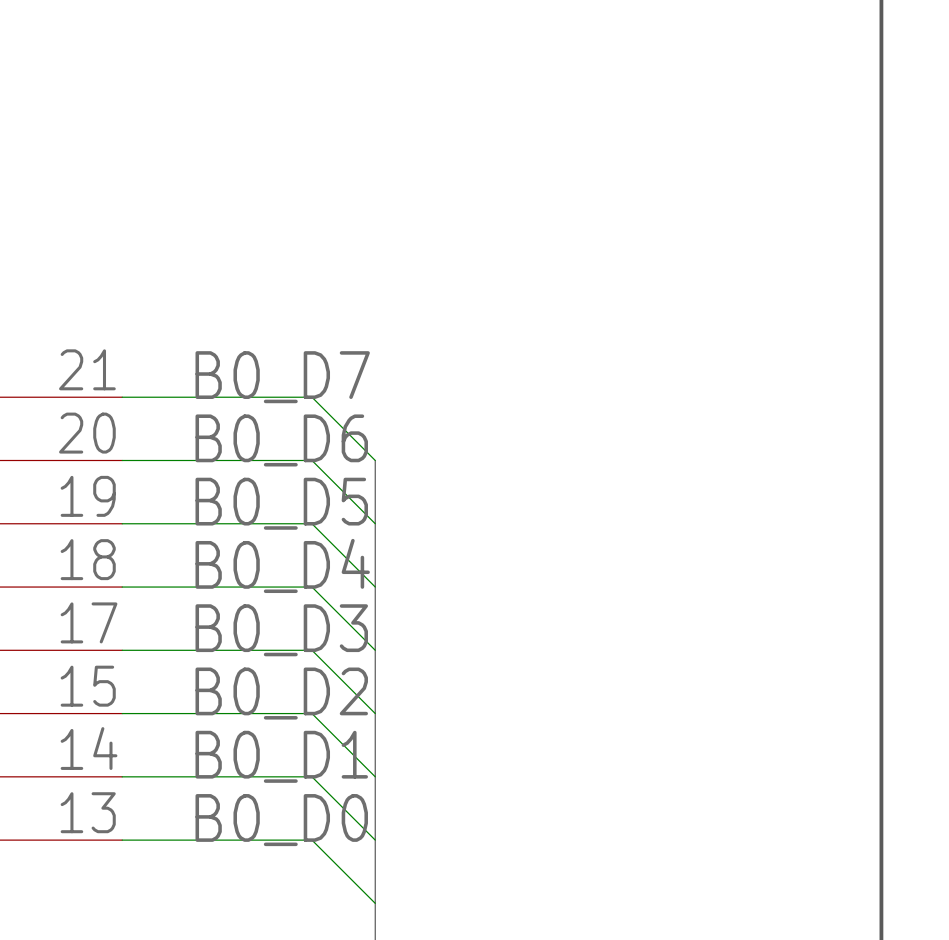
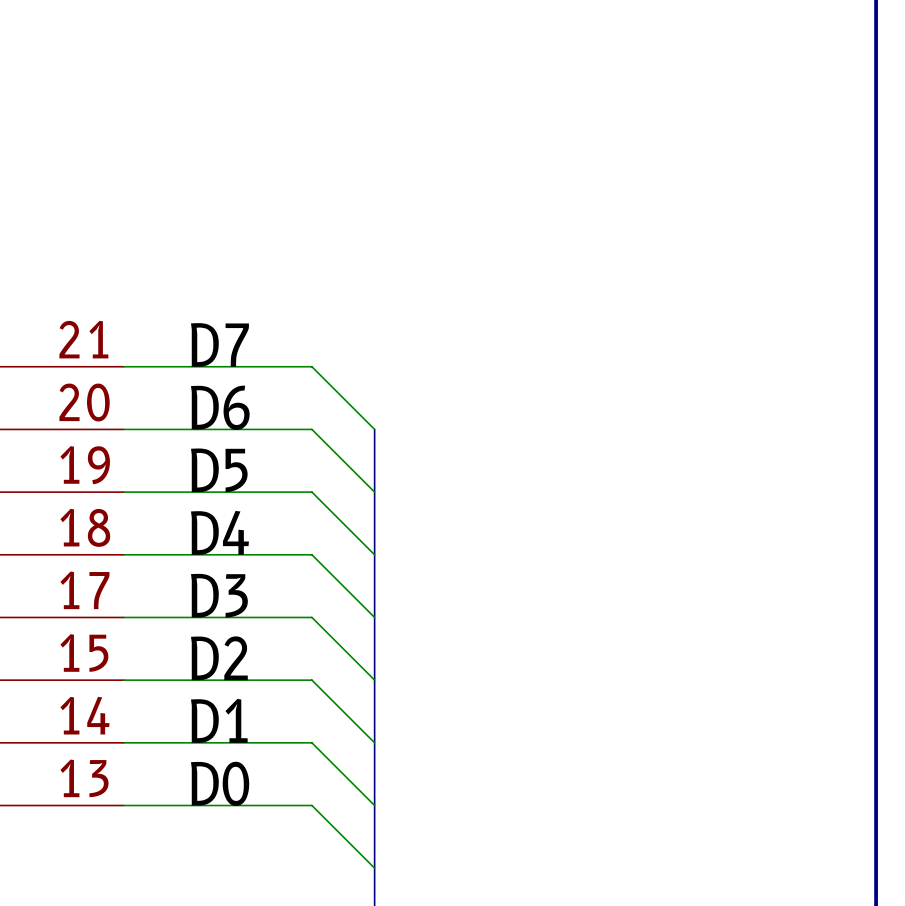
label: B0_D7 (282, 377) -> D7 (219, 344)
label: B0_D6 (281, 440) -> D6 (220, 407)
label: B0_D5 (281, 503) -> D5 (219, 470)
label: B0_D4 (282, 565) -> D4 (219, 532)
label: B0_D3 (281, 630) -> D3 (219, 595)
label: B0_D2 (281, 693) -> D2 (219, 658)
label: B0_D1 (281, 756) -> D1 (219, 720)
label: B0_D0 (281, 820) -> D0 (220, 783)

